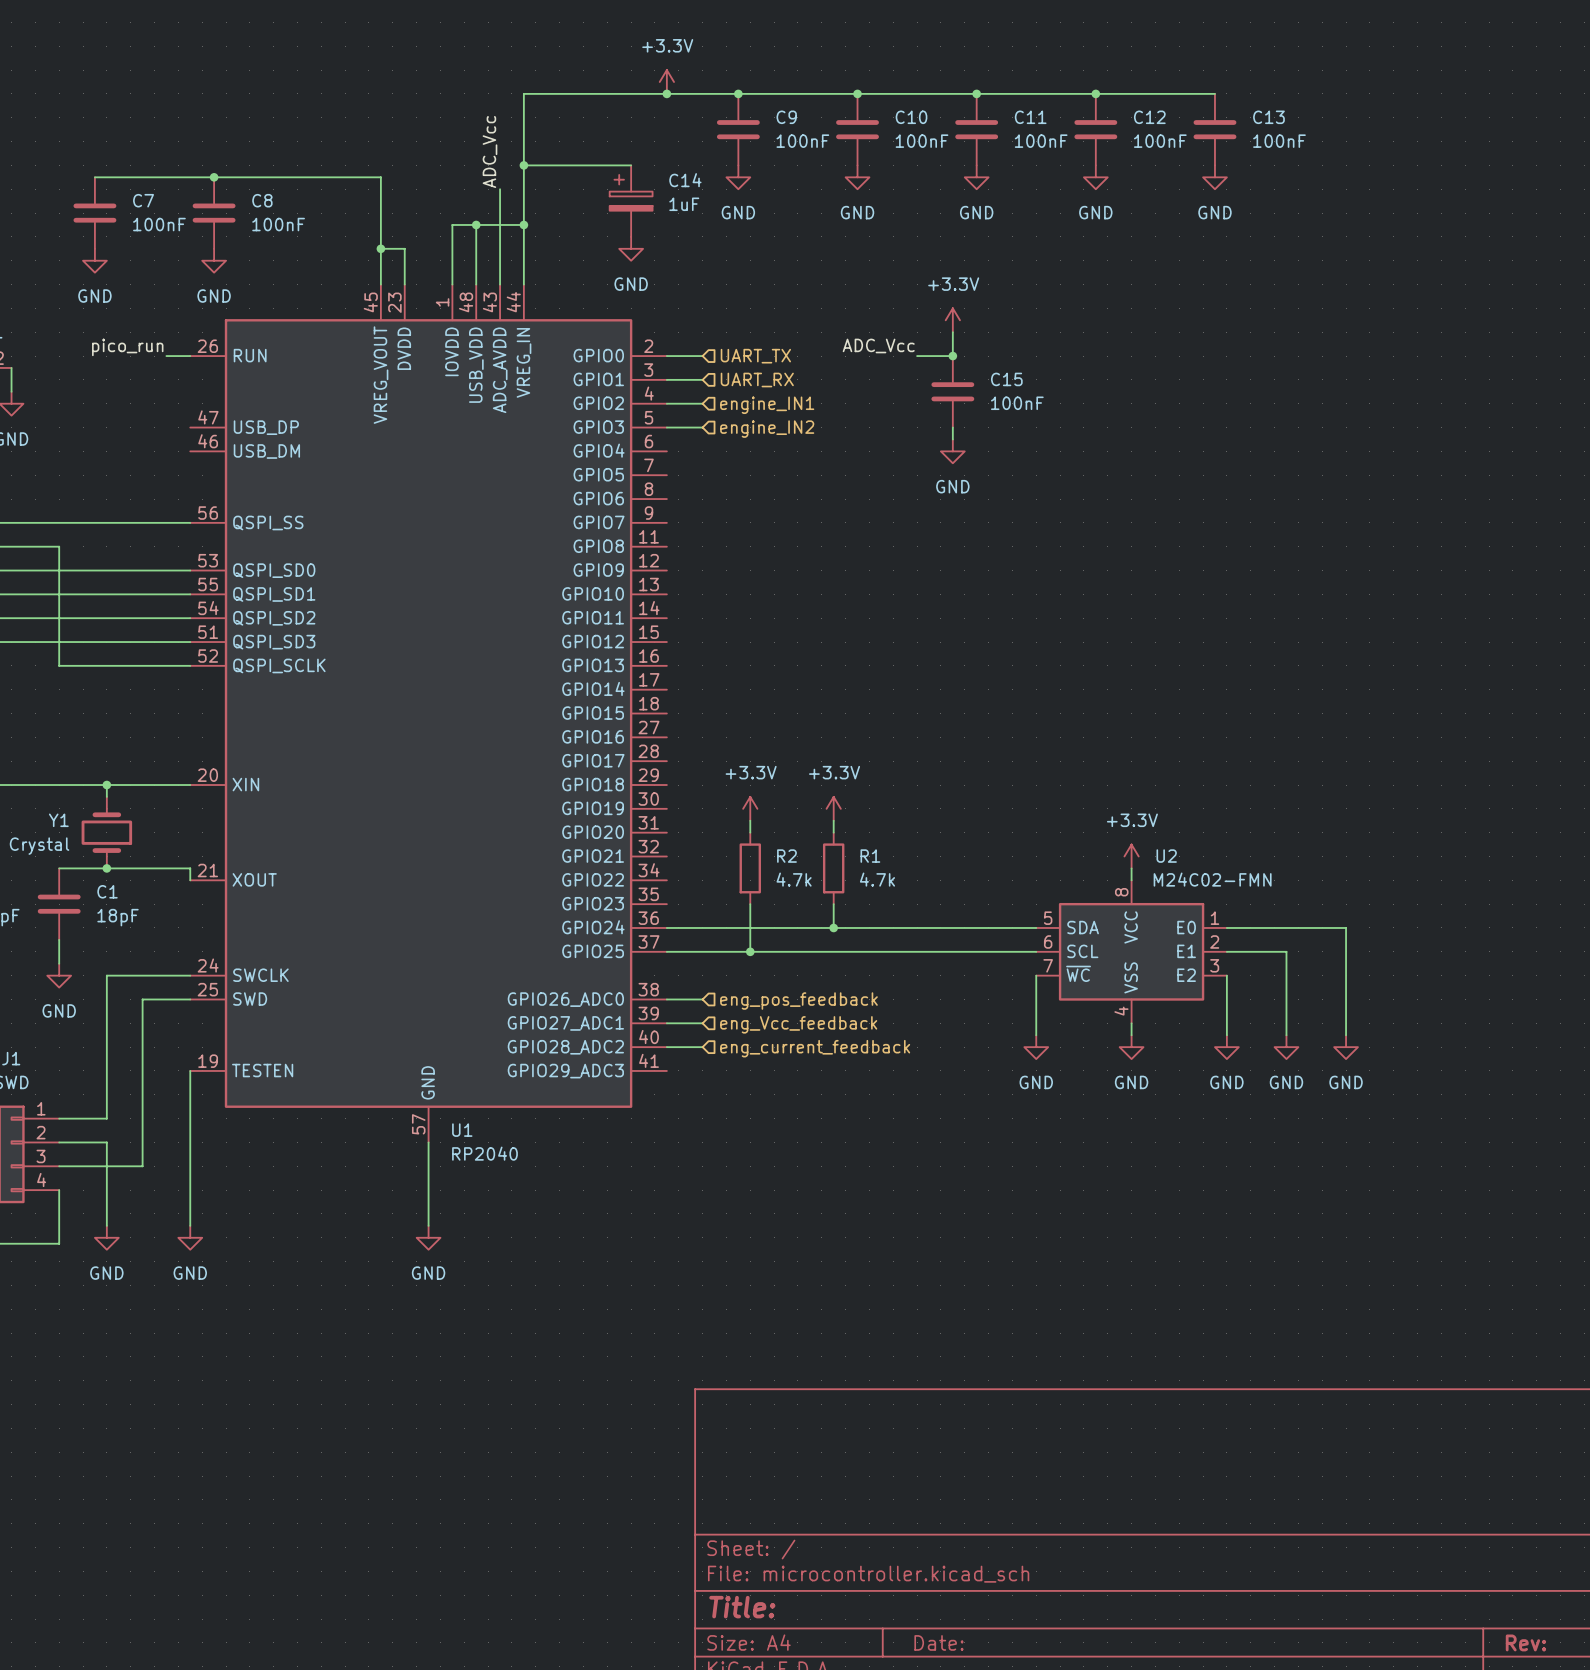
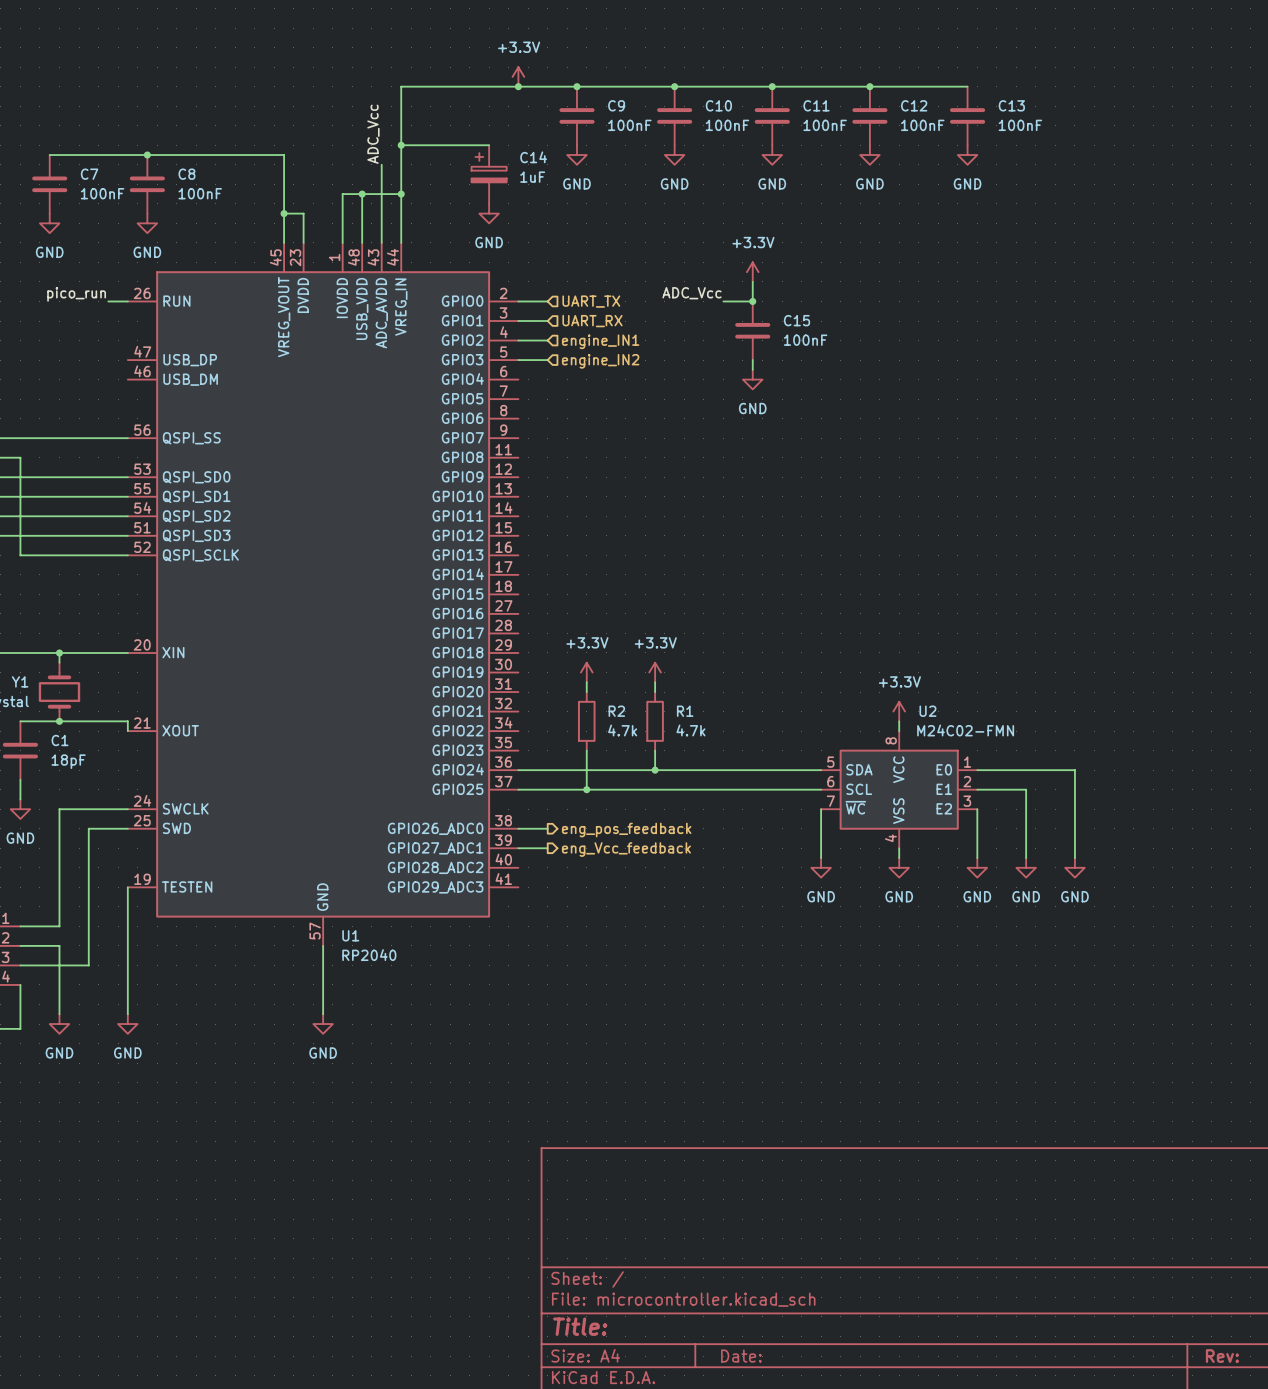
hierarchical label shape: input (798, 1001) -> output (626, 830)
hierarchical label shape: input (798, 1024) -> output (626, 849)
wire: (666, 1047) (702, 1047) -> none
hierarchical label: eng_current_feedback (815, 1048) -> none

